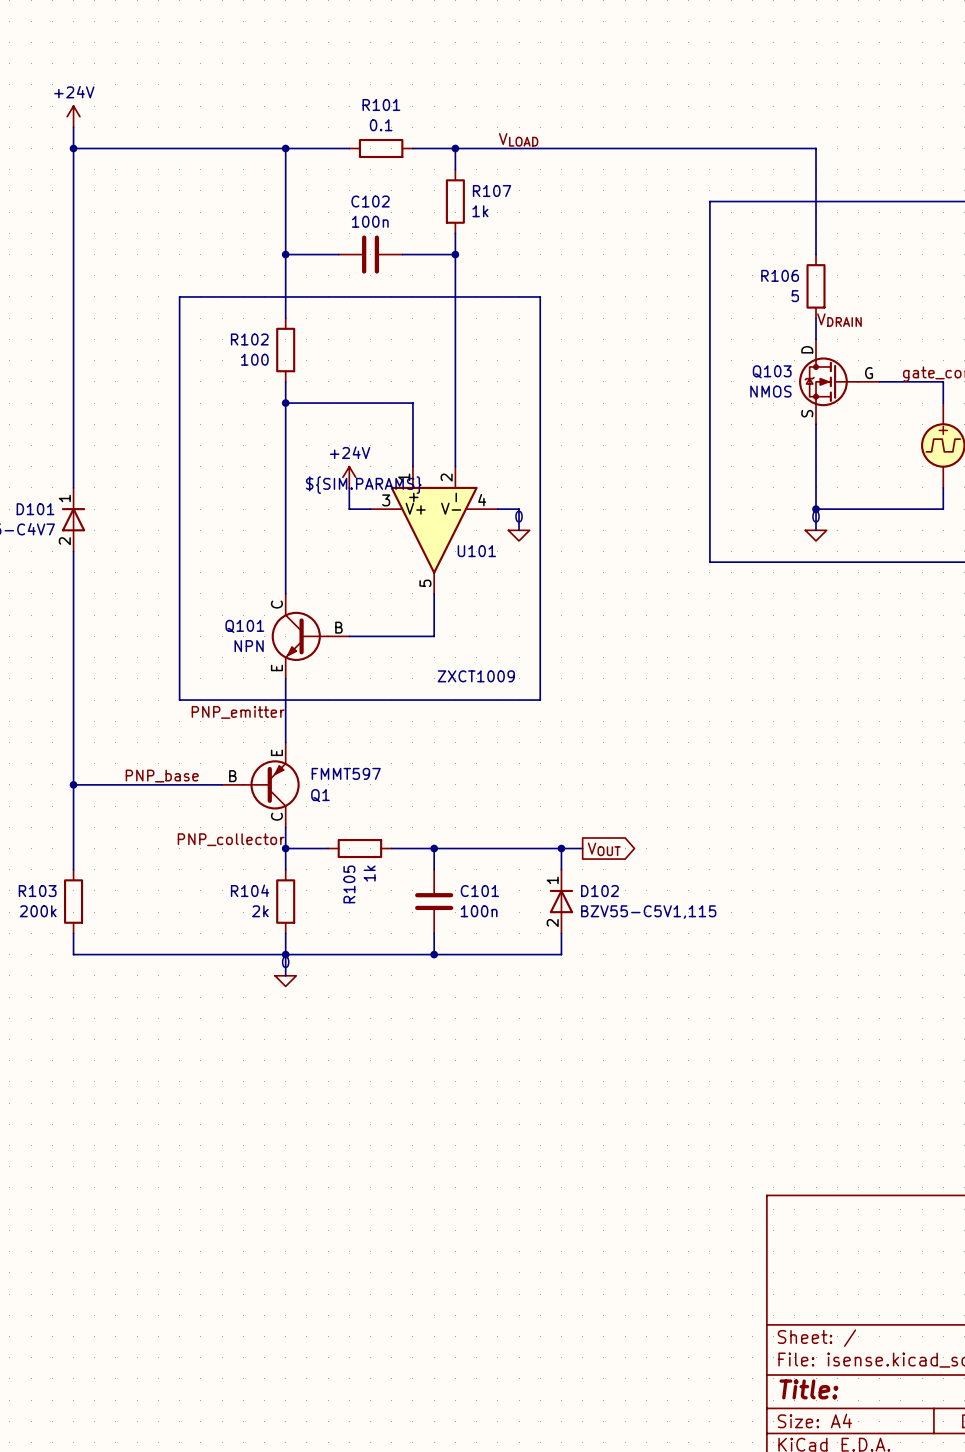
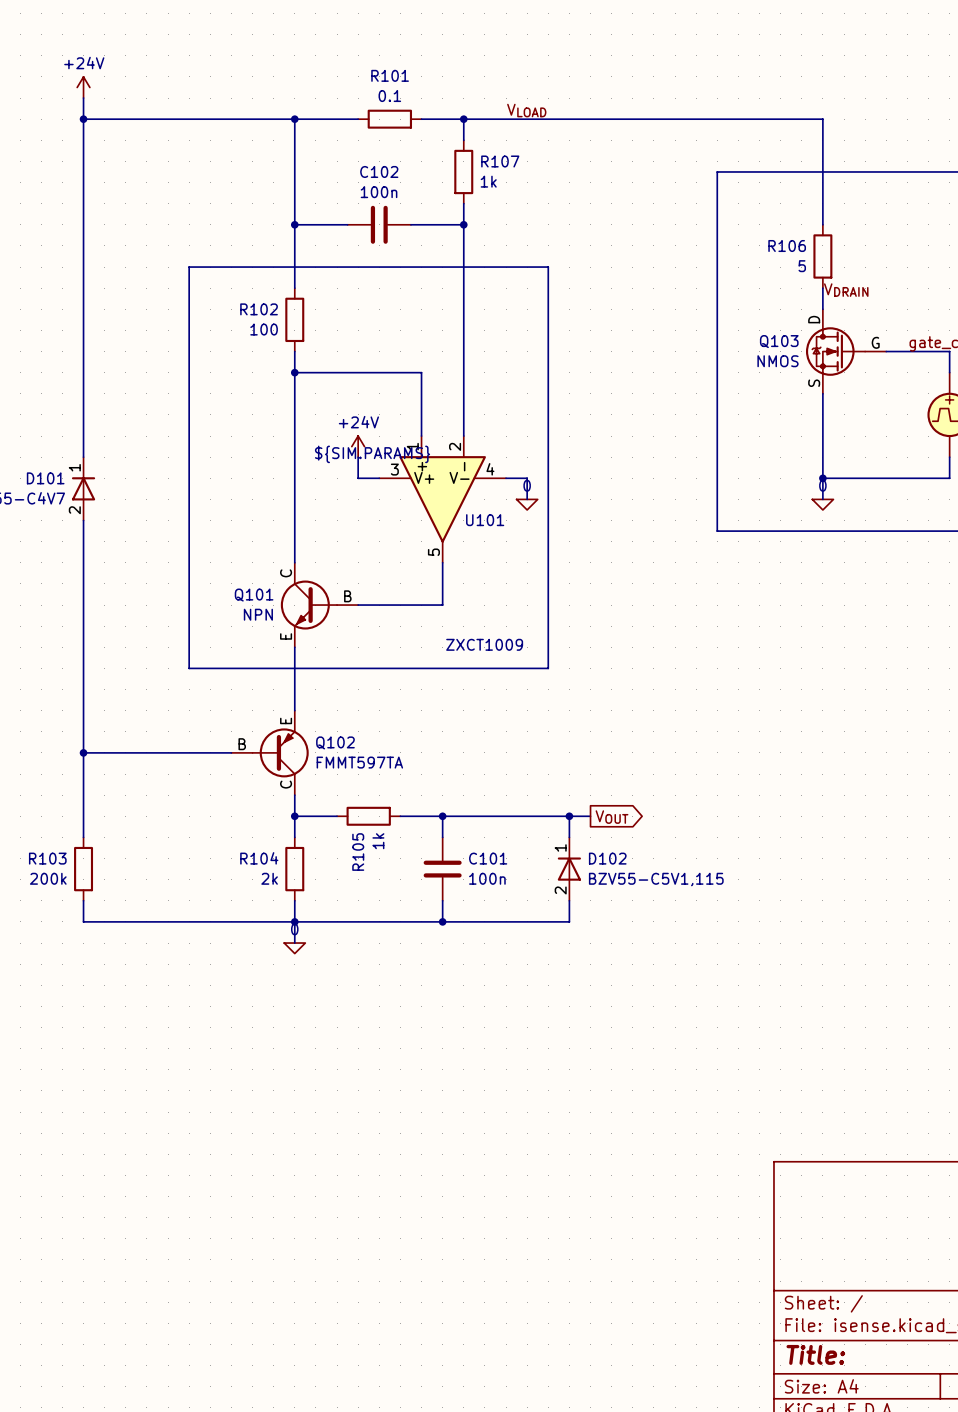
label: PNP_emitter (238, 712) -> none
Q1 value: FMMT597 (346, 773) -> FMMT597TA (359, 762)
label: PNP_base (162, 776) -> none
Q1 name: Q1 (320, 795) -> Q102 (335, 742)
label: PNP_collector (231, 839) -> none

